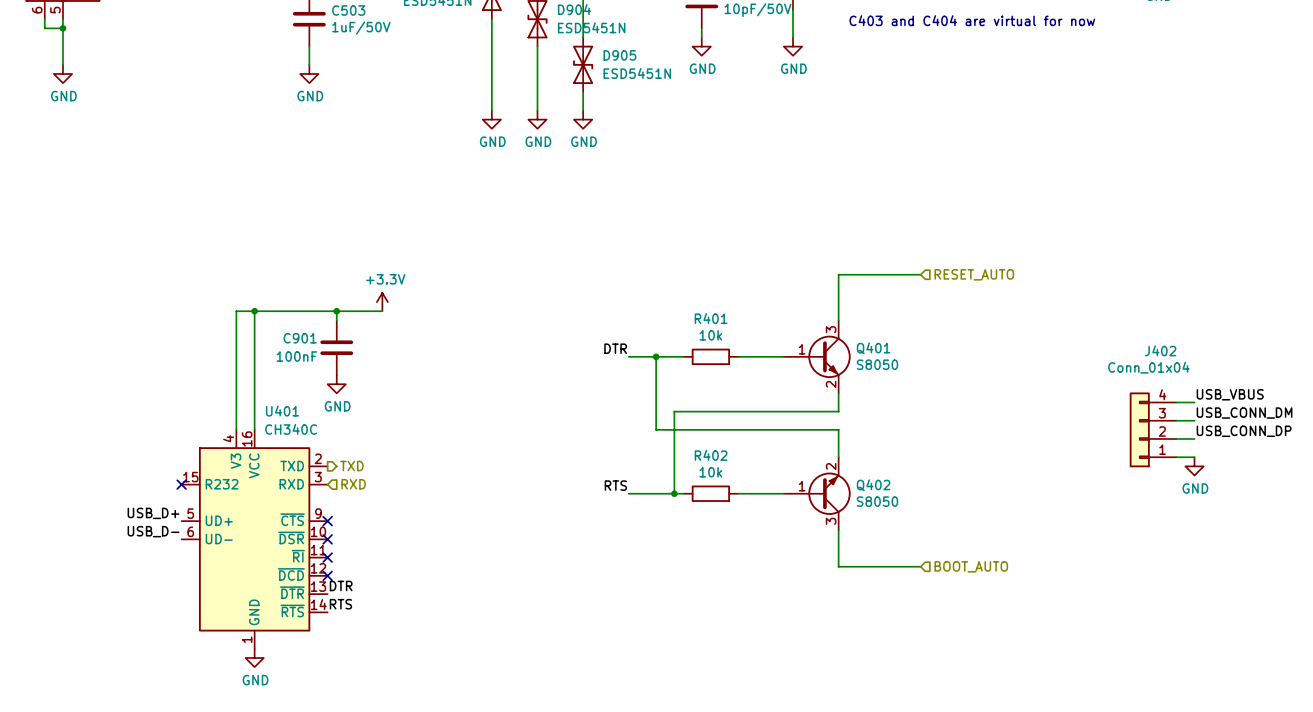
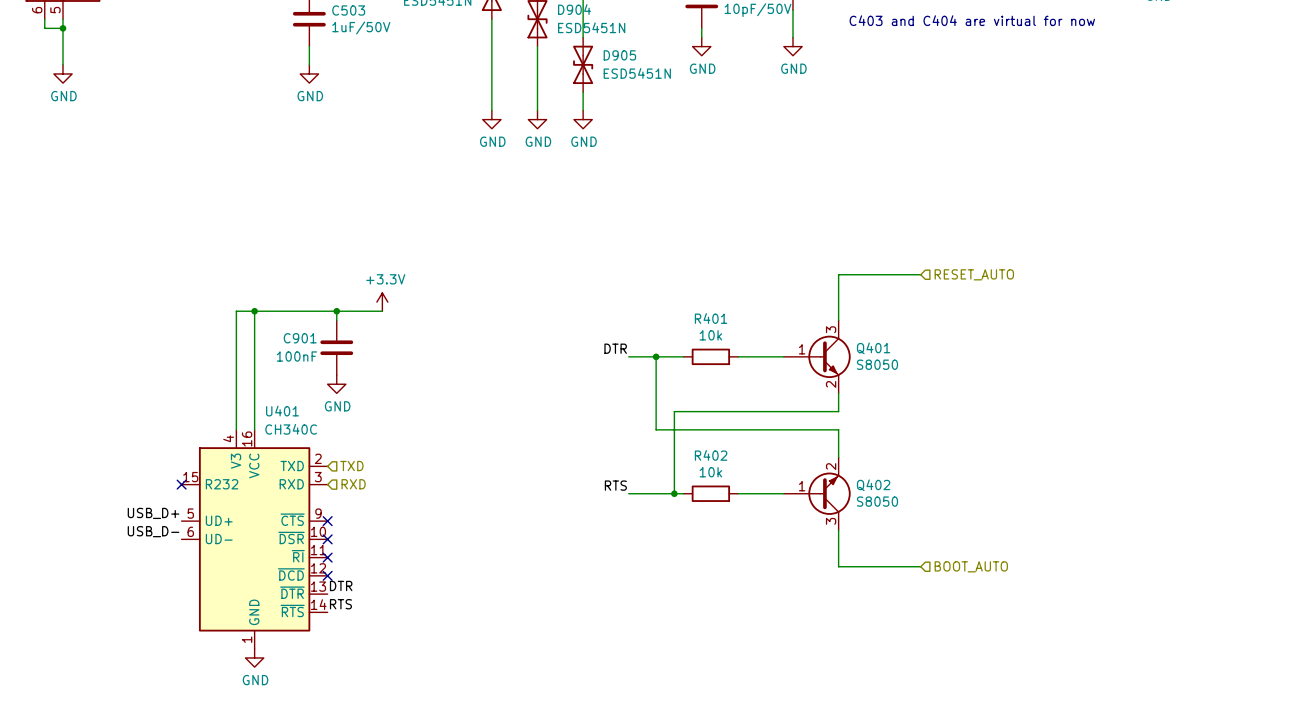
label: USB_VBUS (1230, 394) -> none
wire: (1176, 402) (1194, 402) -> none
label: USB_CONN_DM (1244, 413) -> none
wire: (1176, 420) (1194, 420) -> none
J402: Conn_01x04 (1152, 429) -> none
label: USB_CONN_DP (1244, 431) -> none
wire: (1176, 438) (1194, 438) -> none
wire: (1176, 457) (1194, 457) -> none
hierarchical label shape: output (351, 466) -> input (351, 466)
power symbol: GND (1194, 466) -> none

